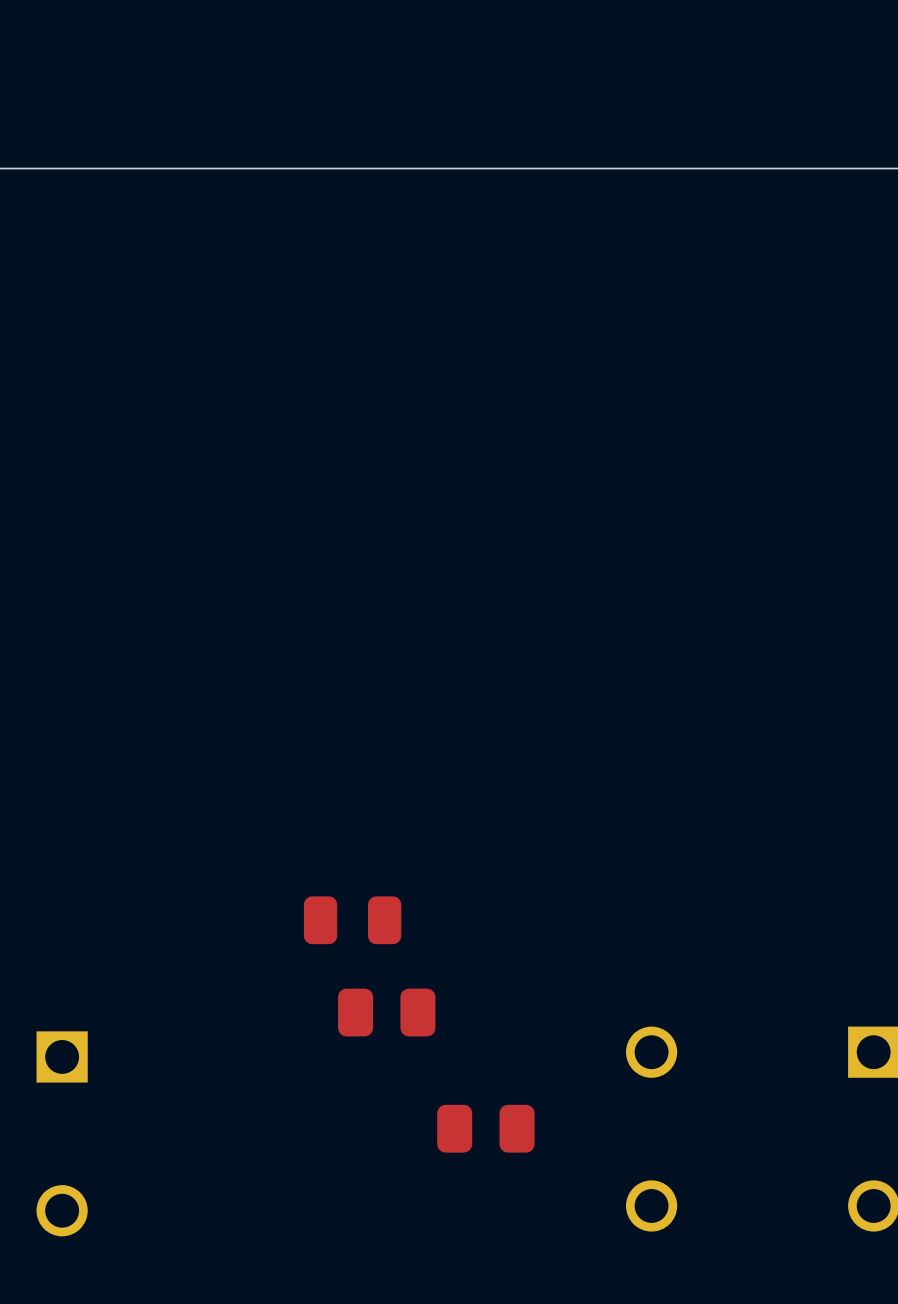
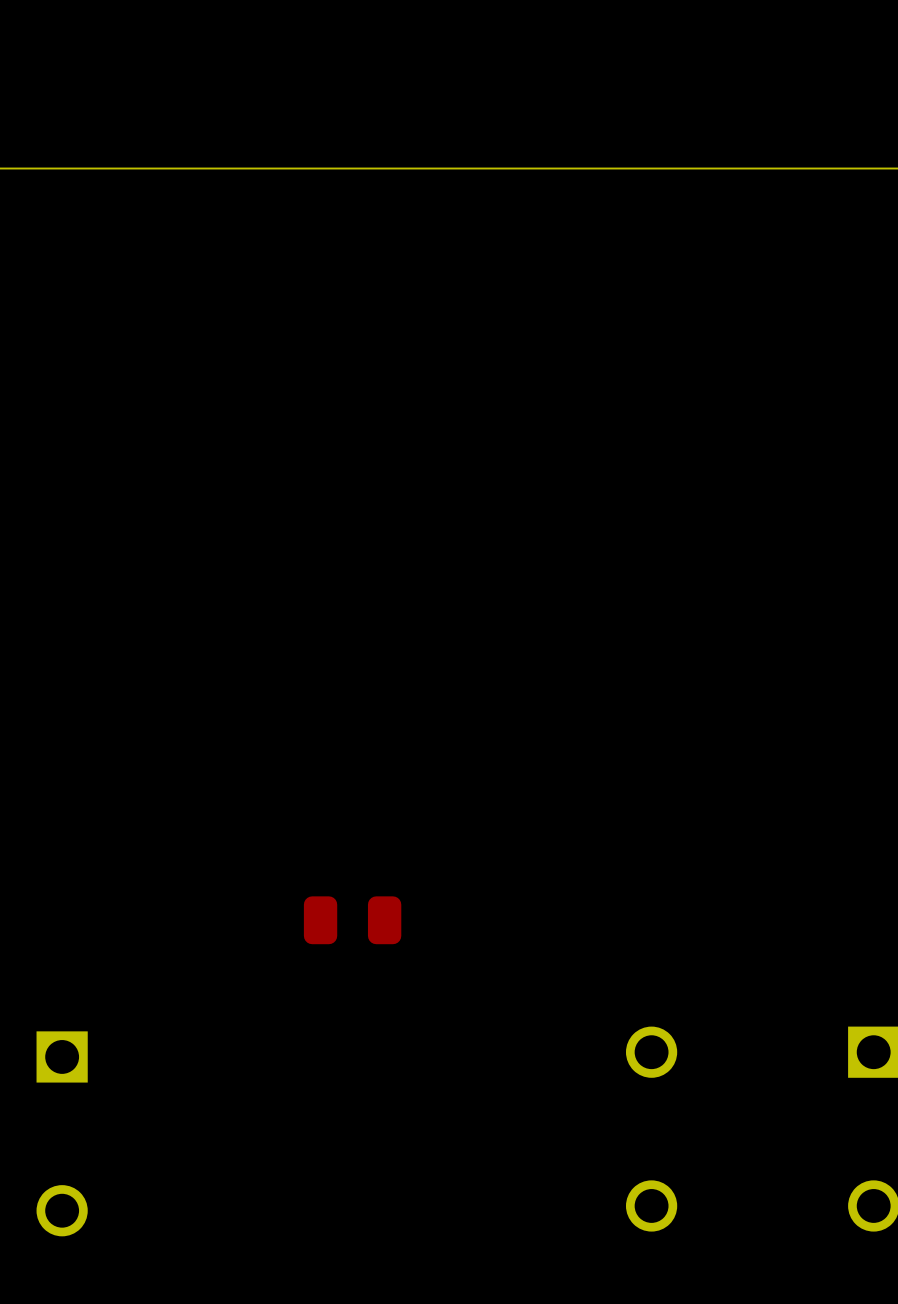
part: (386, 1012) -> none
part: (485, 1128) -> none

